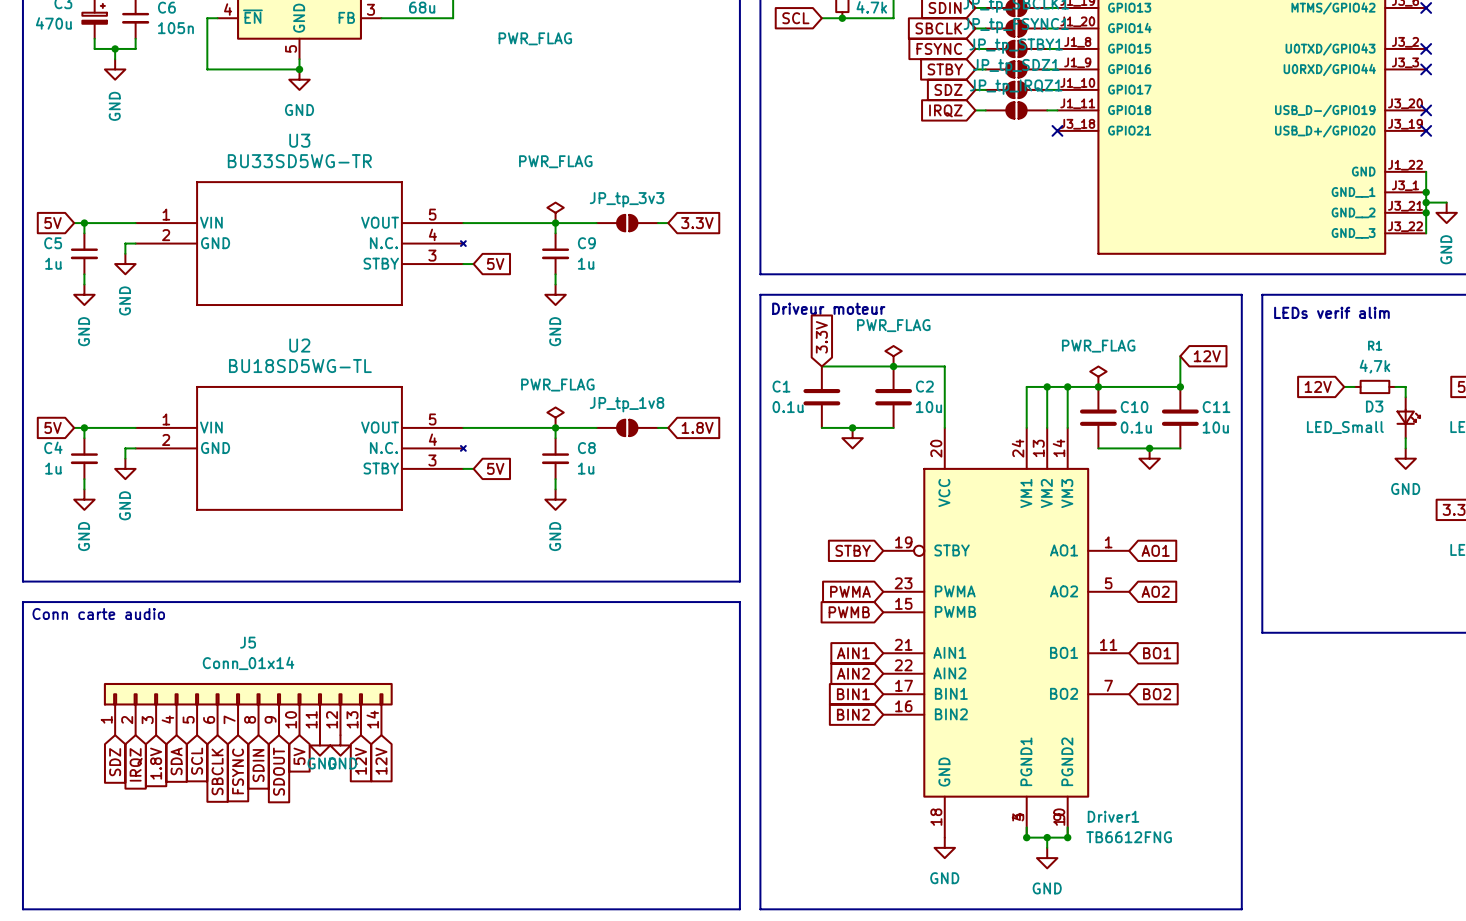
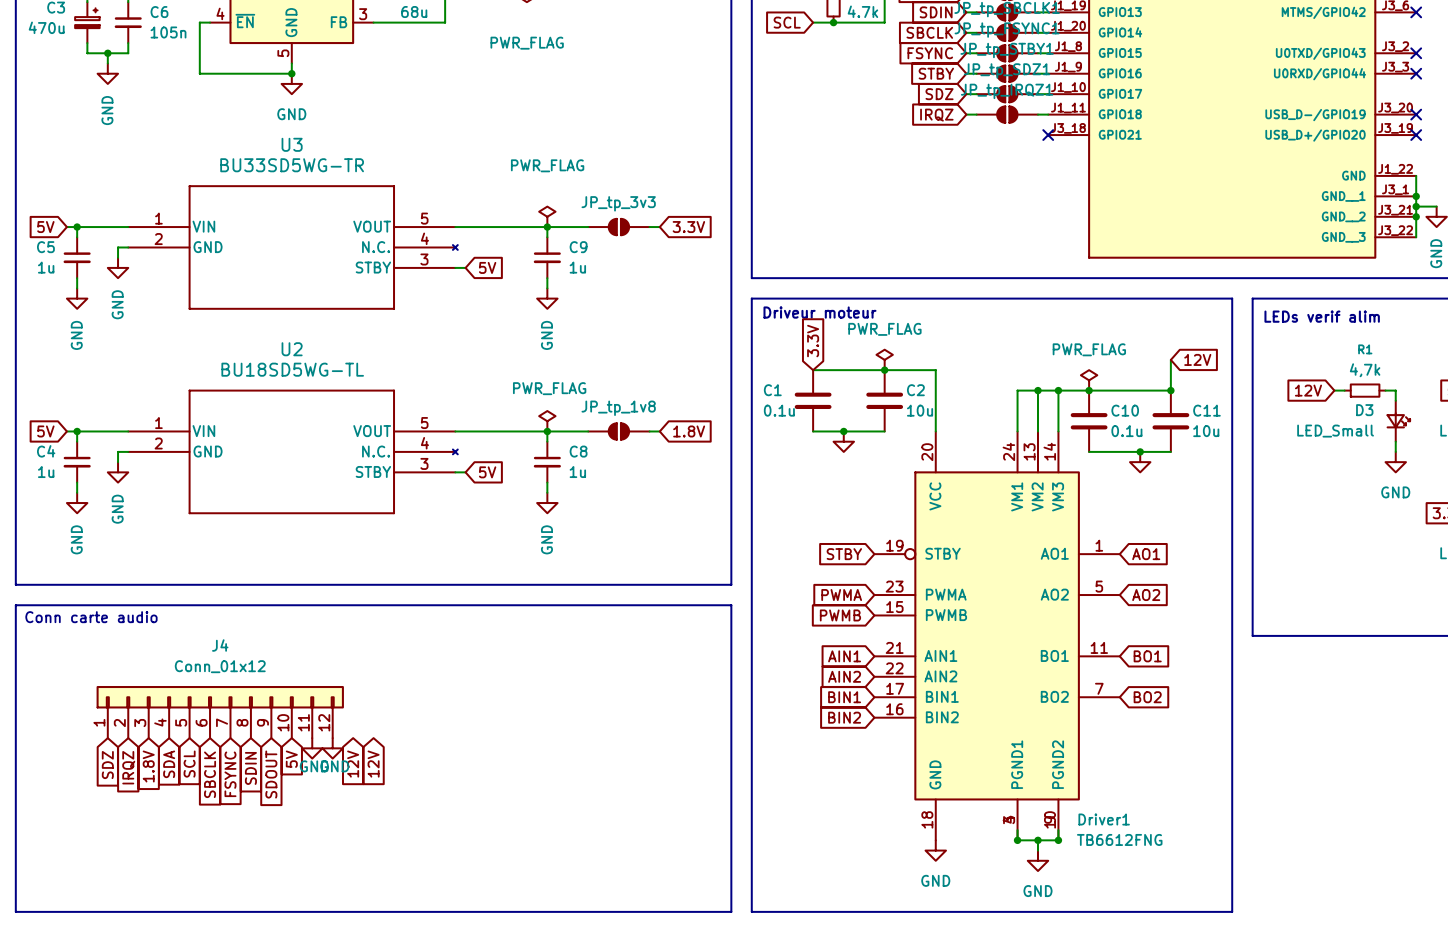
J4: none -> Conn_01x12 (220, 712)
J5: Conn_01x14 (248, 709) -> none

